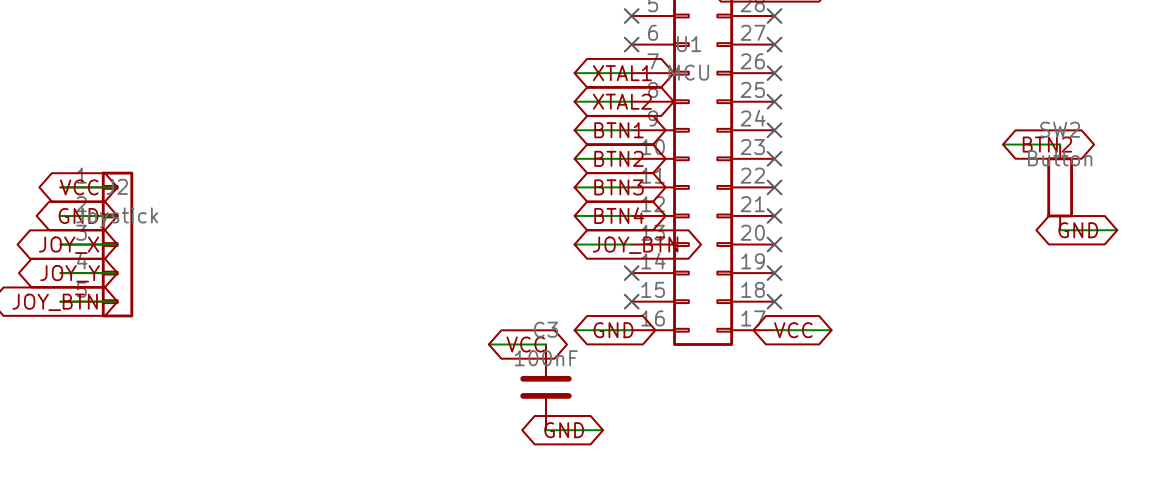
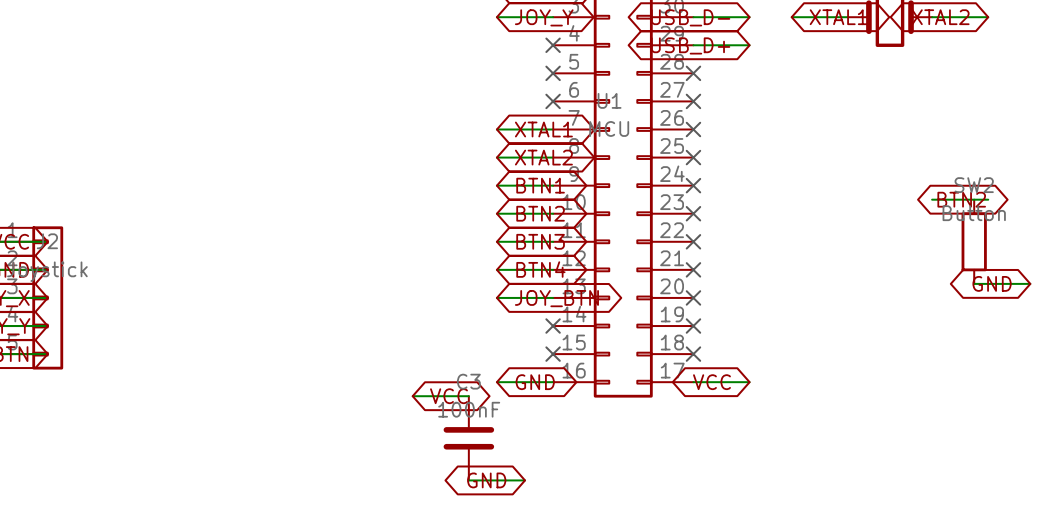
wire: (1003, 144) (1017, 144) -> (974, 199) (988, 199)

